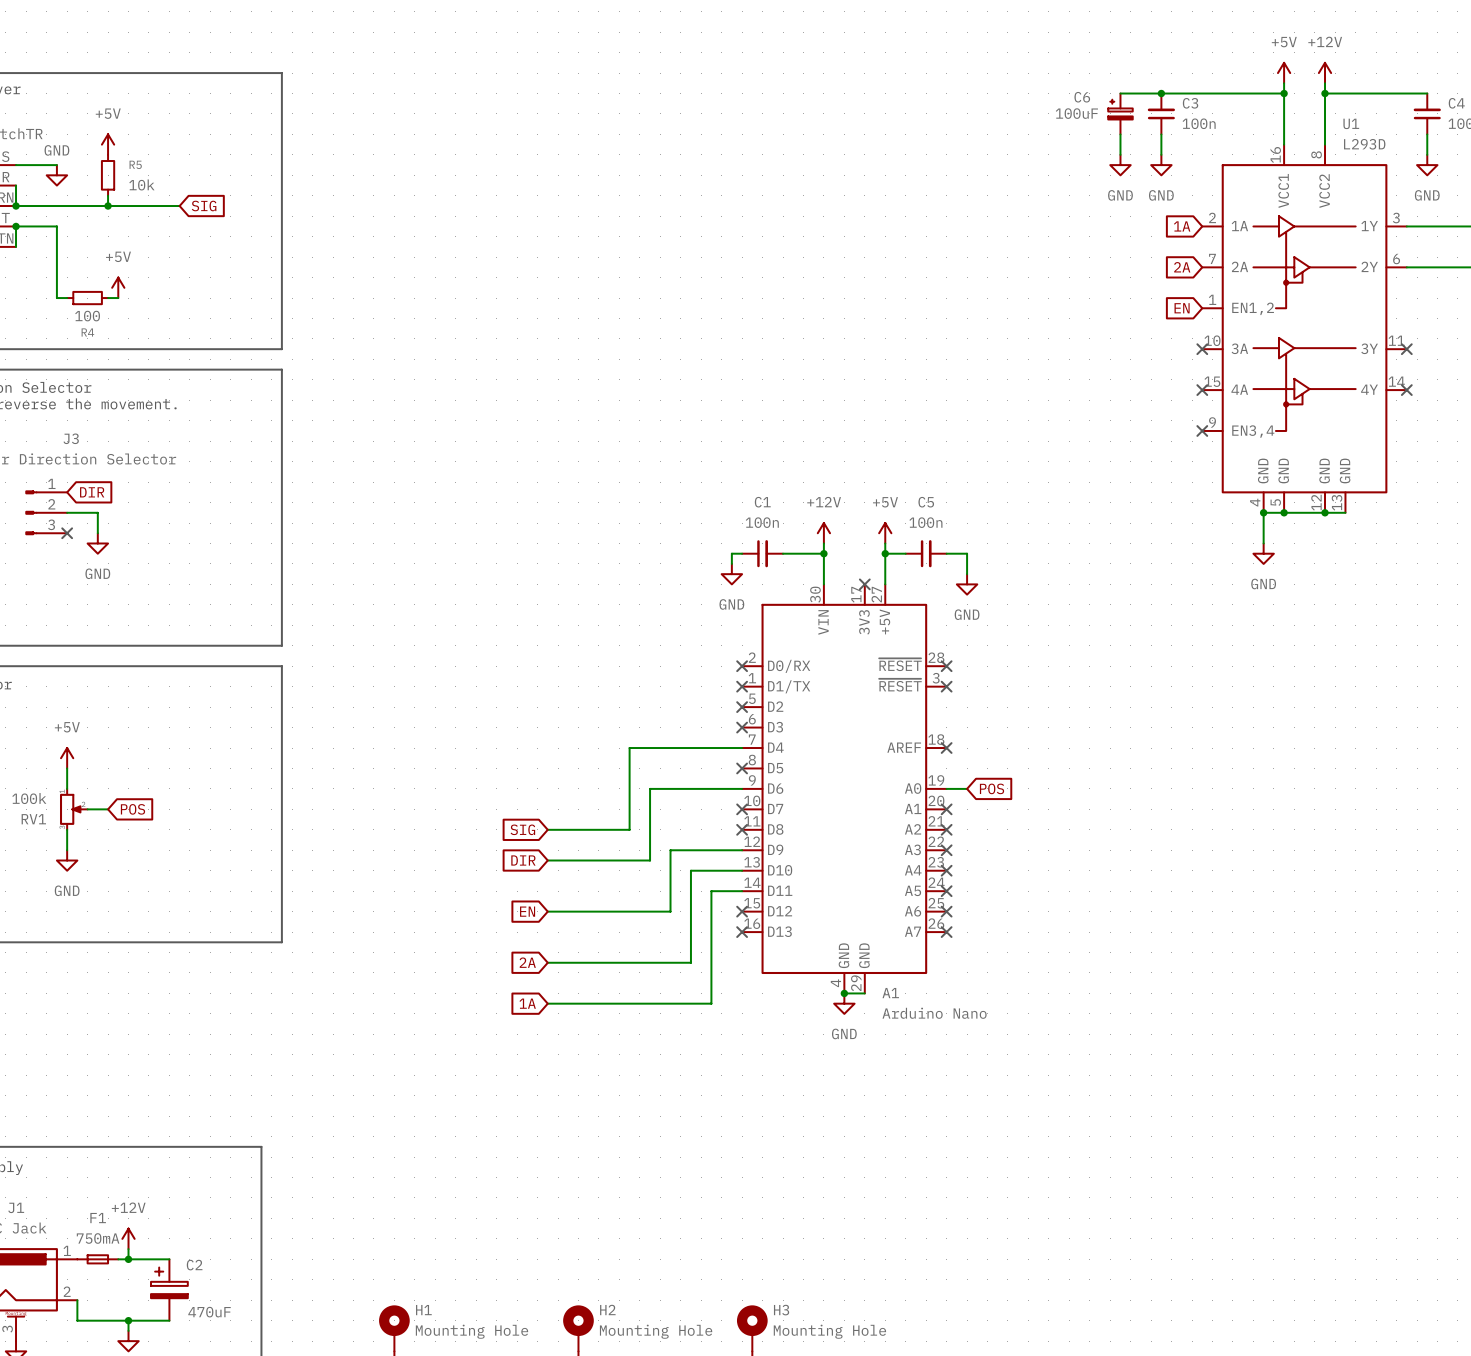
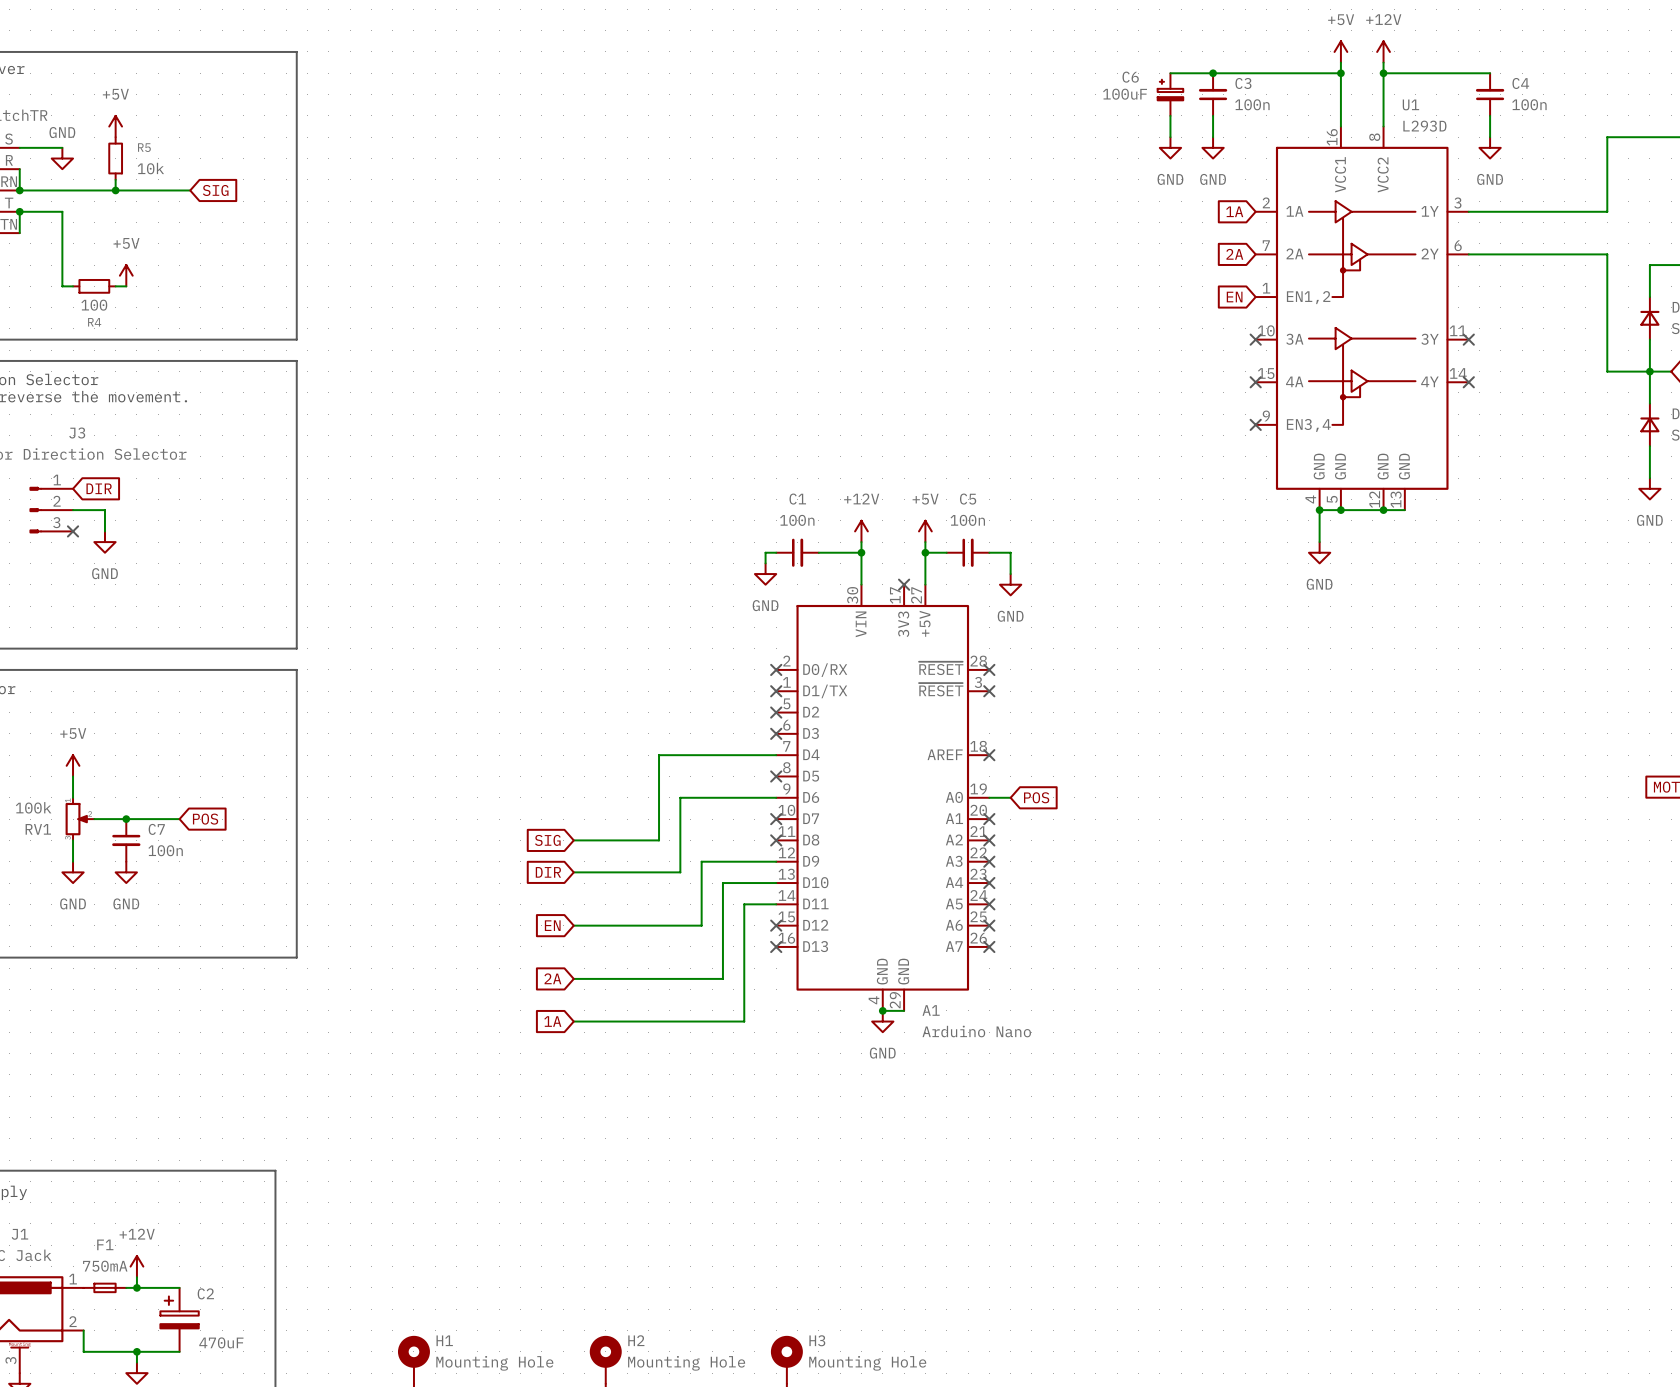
wire: none -> (115, 819) (179, 819)
junction: none -> (126, 819)
global label position: POS (132, 809) -> POS (205, 819)
C7: none -> 100n (126, 840)
power symbol: none -> GND (126, 872)

